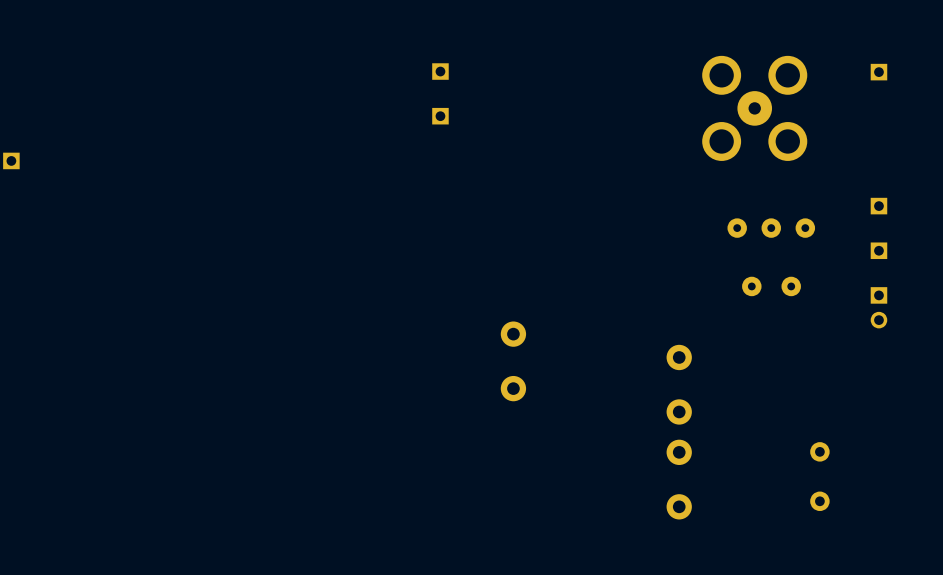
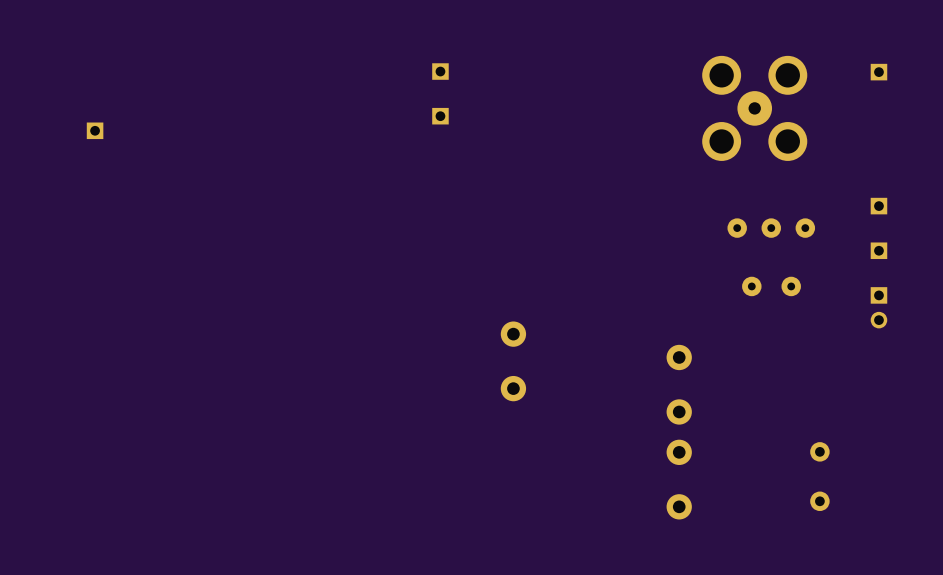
part: none -> (95, 130)
part: (11, 160) -> none

